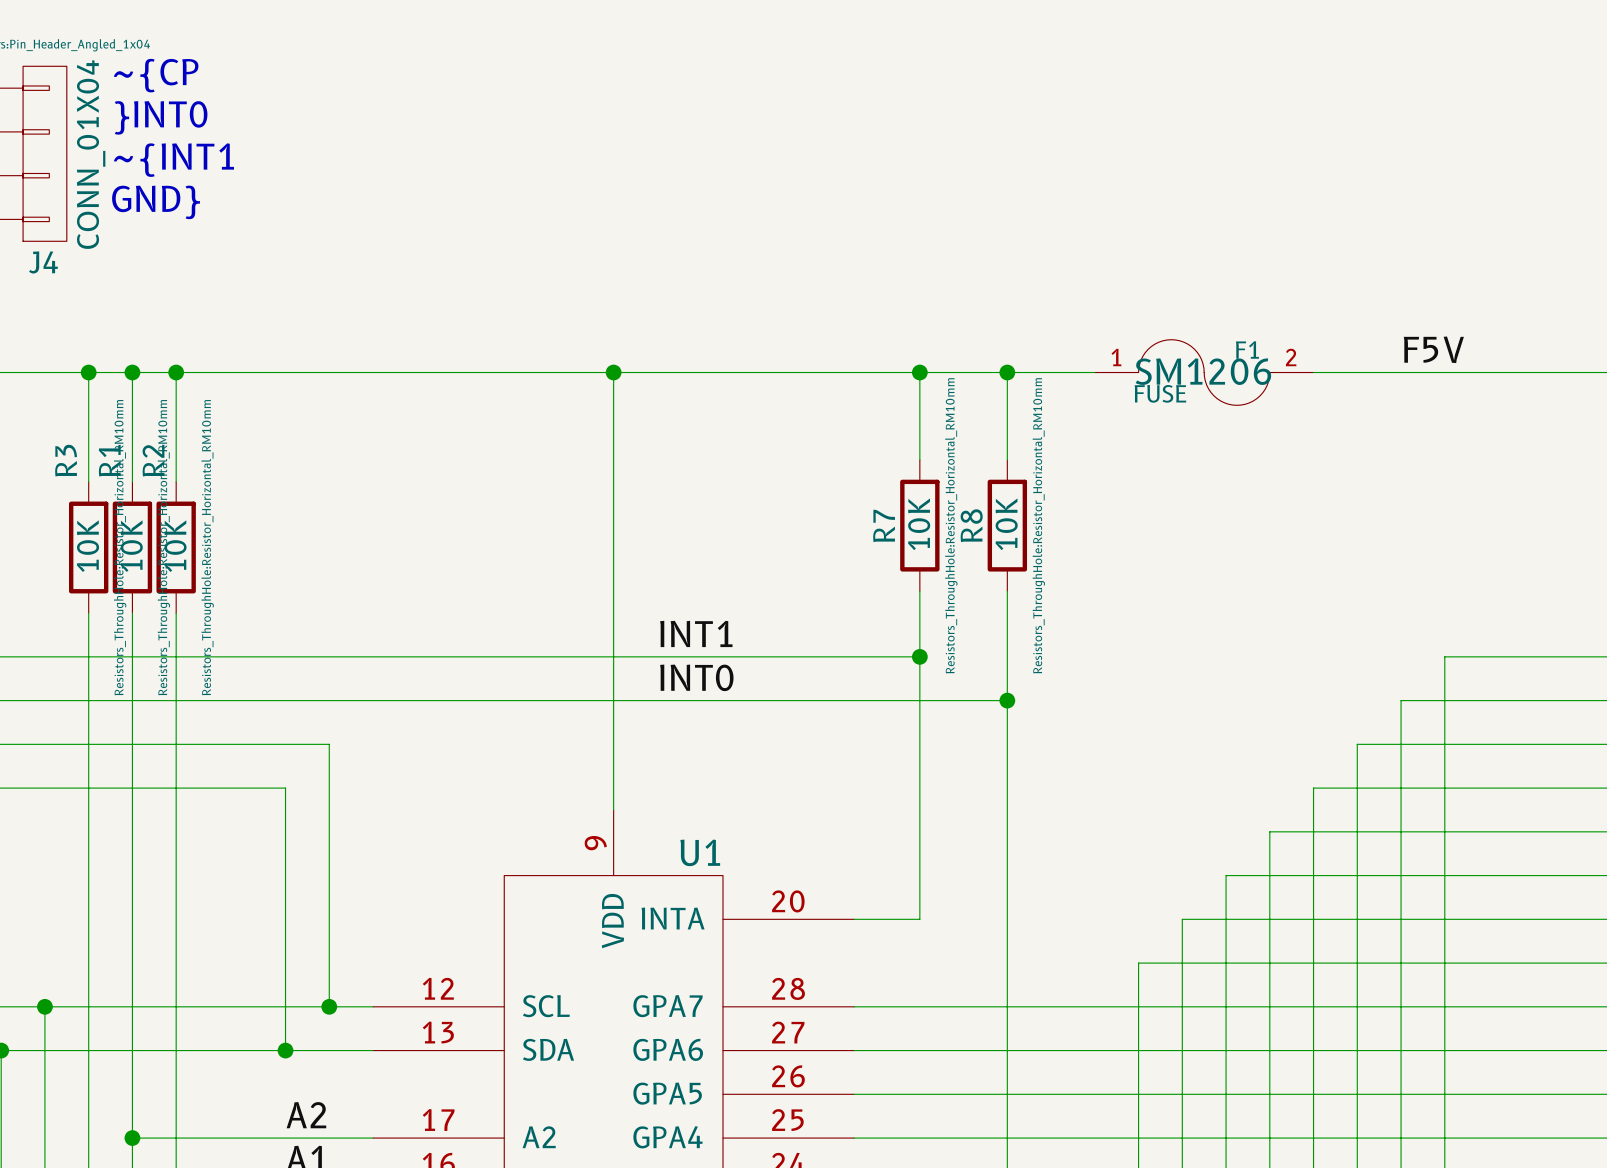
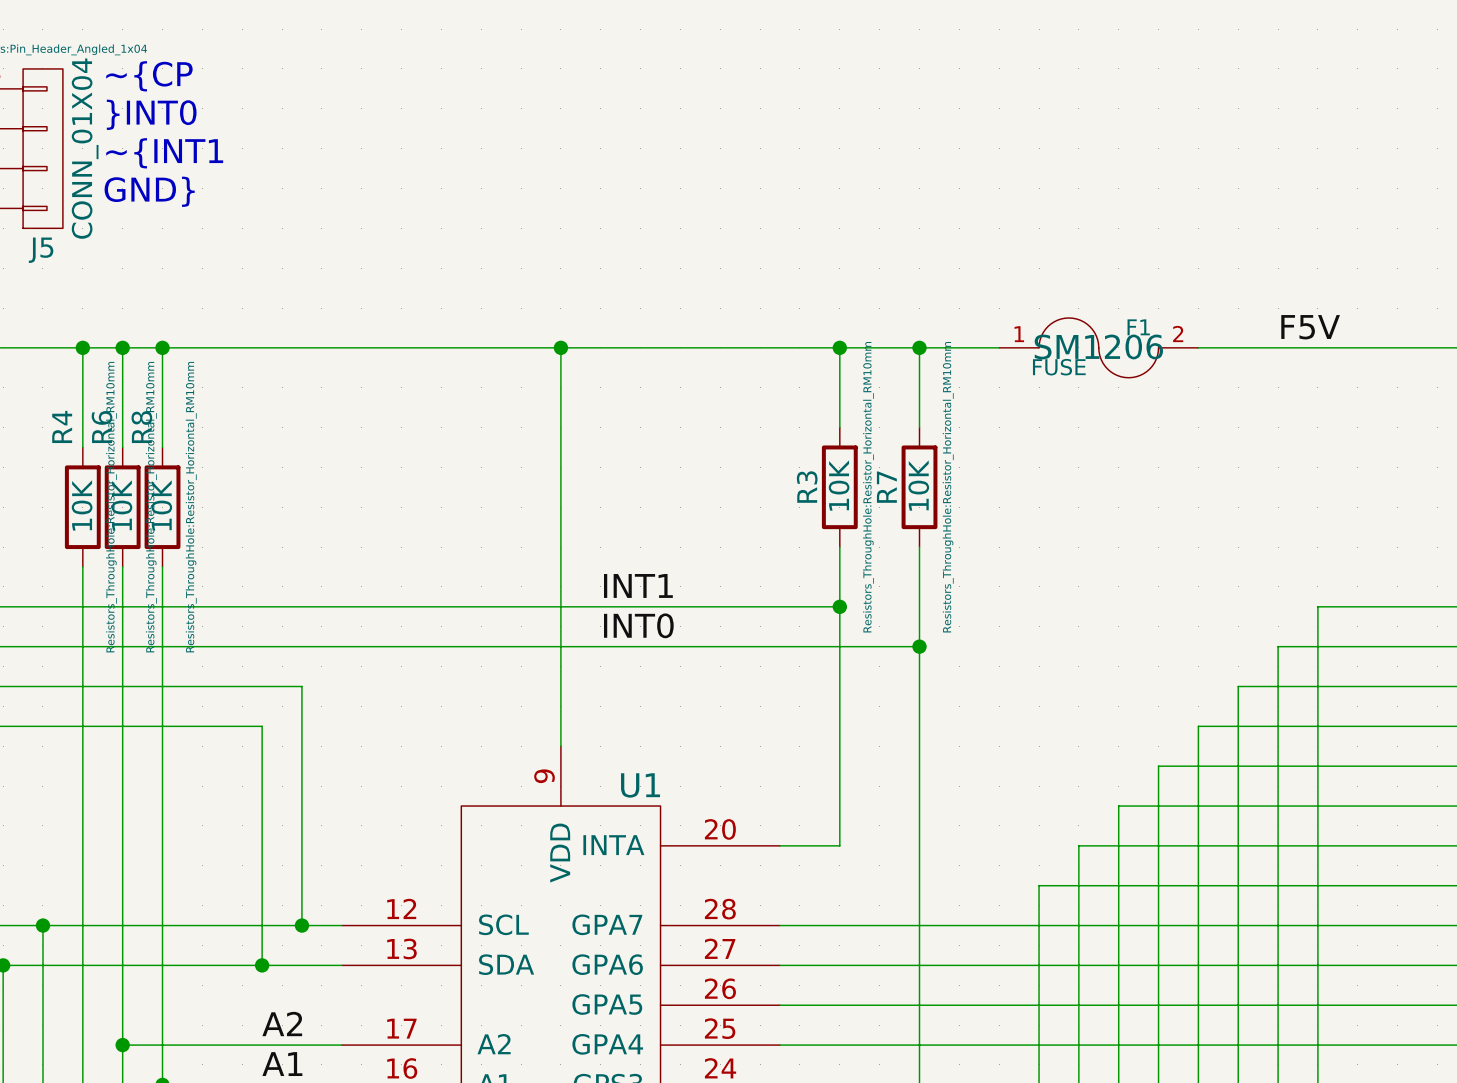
J4 name: J4 (43, 262) -> J5 (41, 250)
R3 name: R3 (66, 460) -> R4 (62, 426)
R1 name: R1 (109, 460) -> R6 (102, 427)
R2 name: R2 (153, 460) -> R8 (141, 427)
R7 name: R7 (884, 525) -> R3 (807, 487)
R8 name: R8 (971, 525) -> R7 (886, 487)

